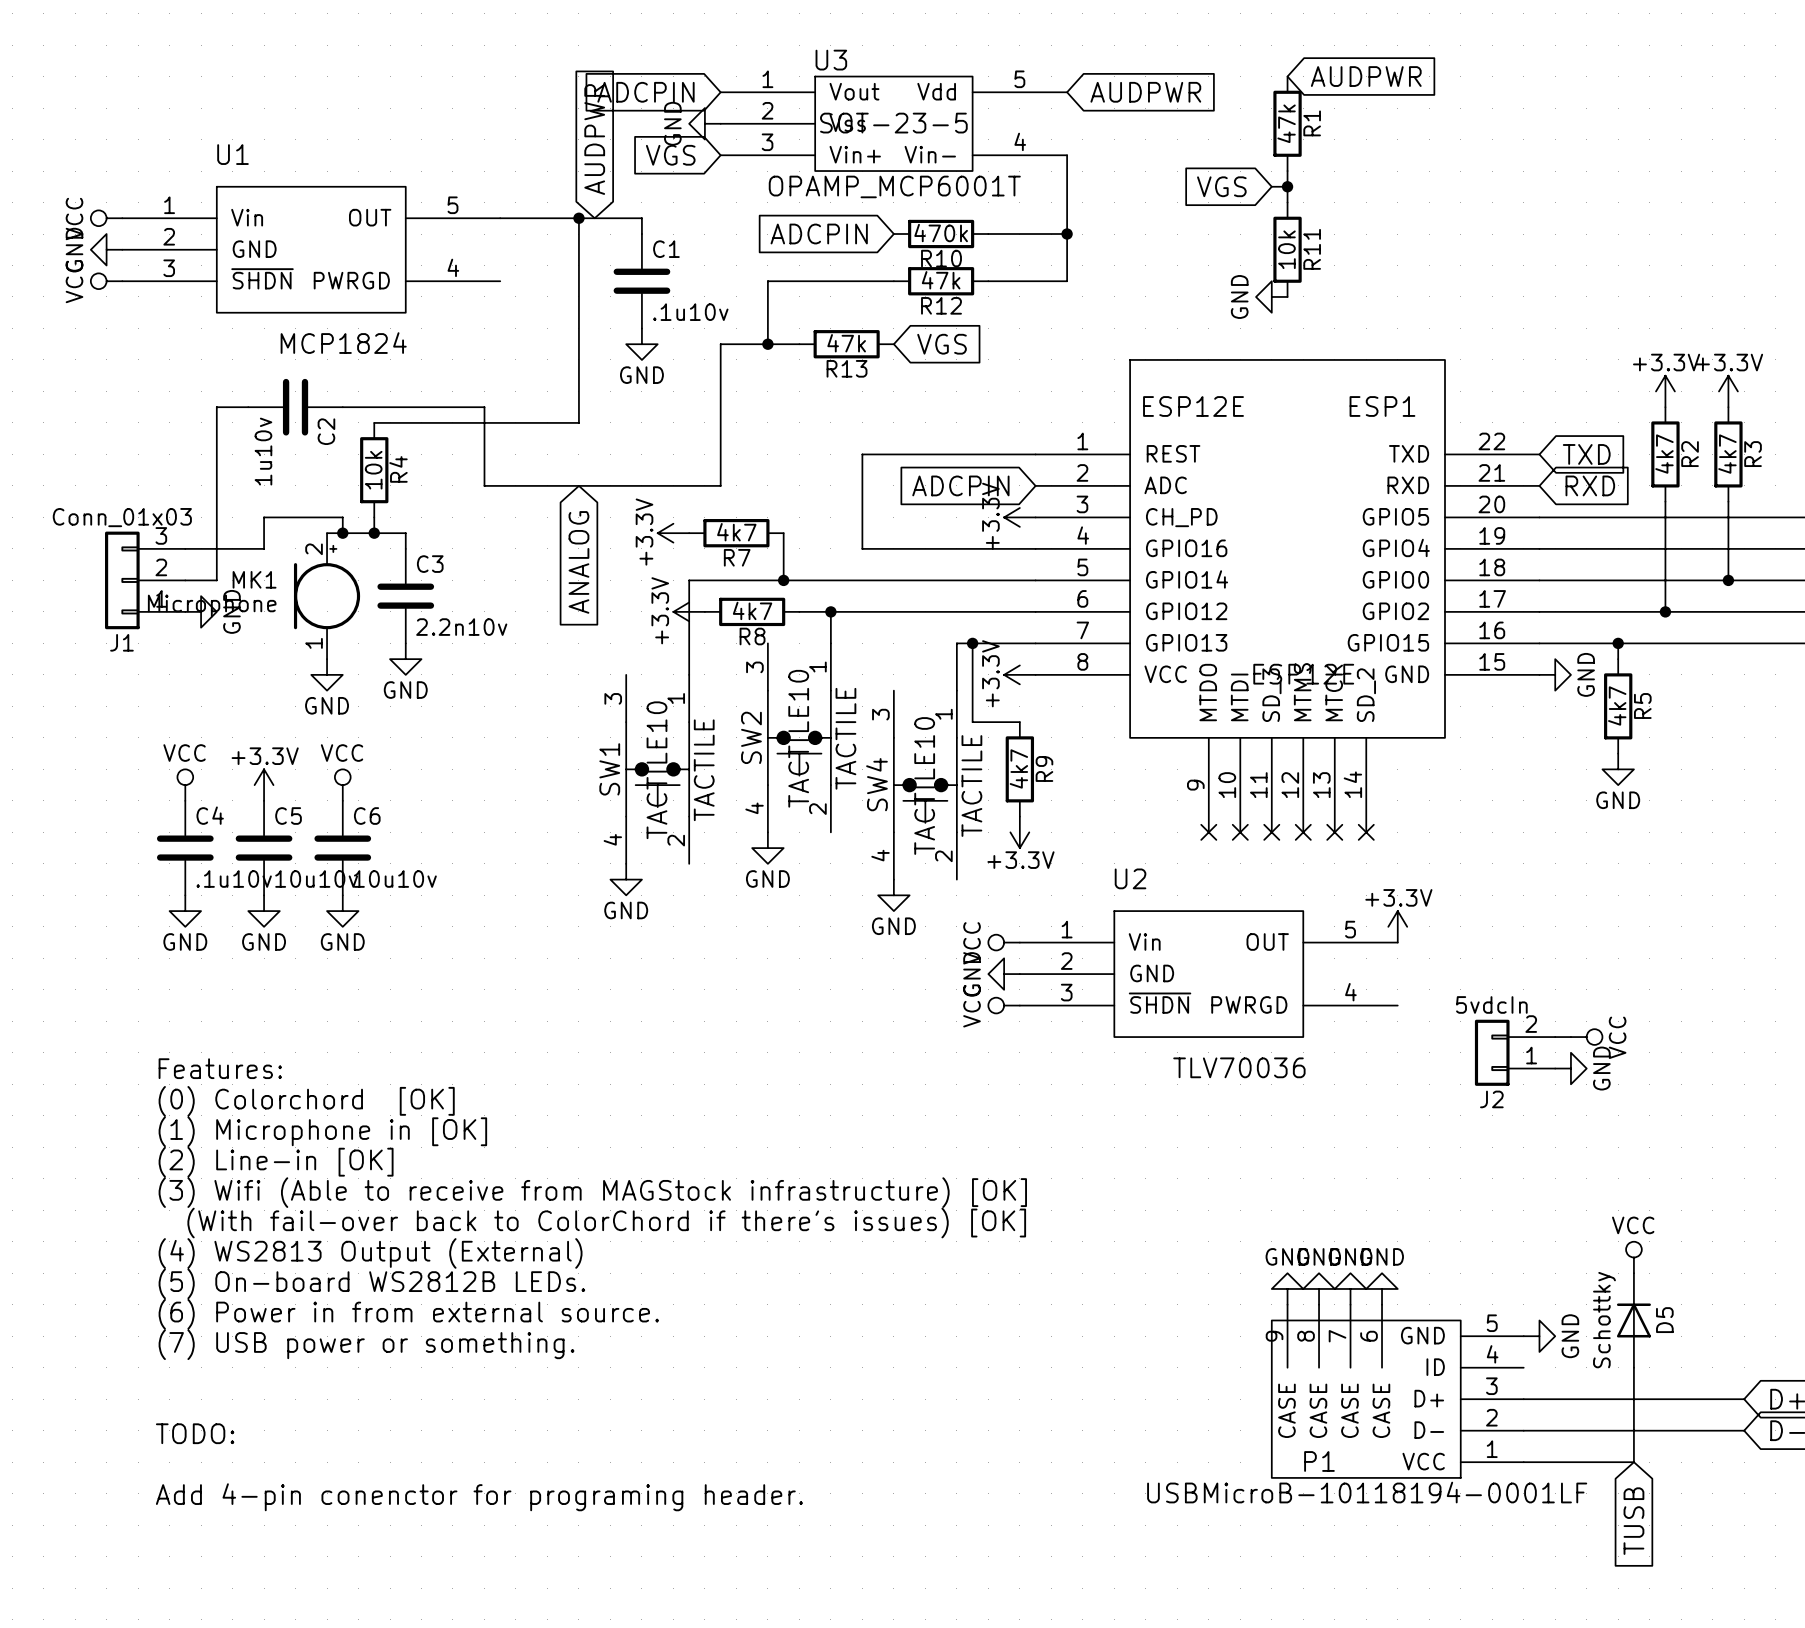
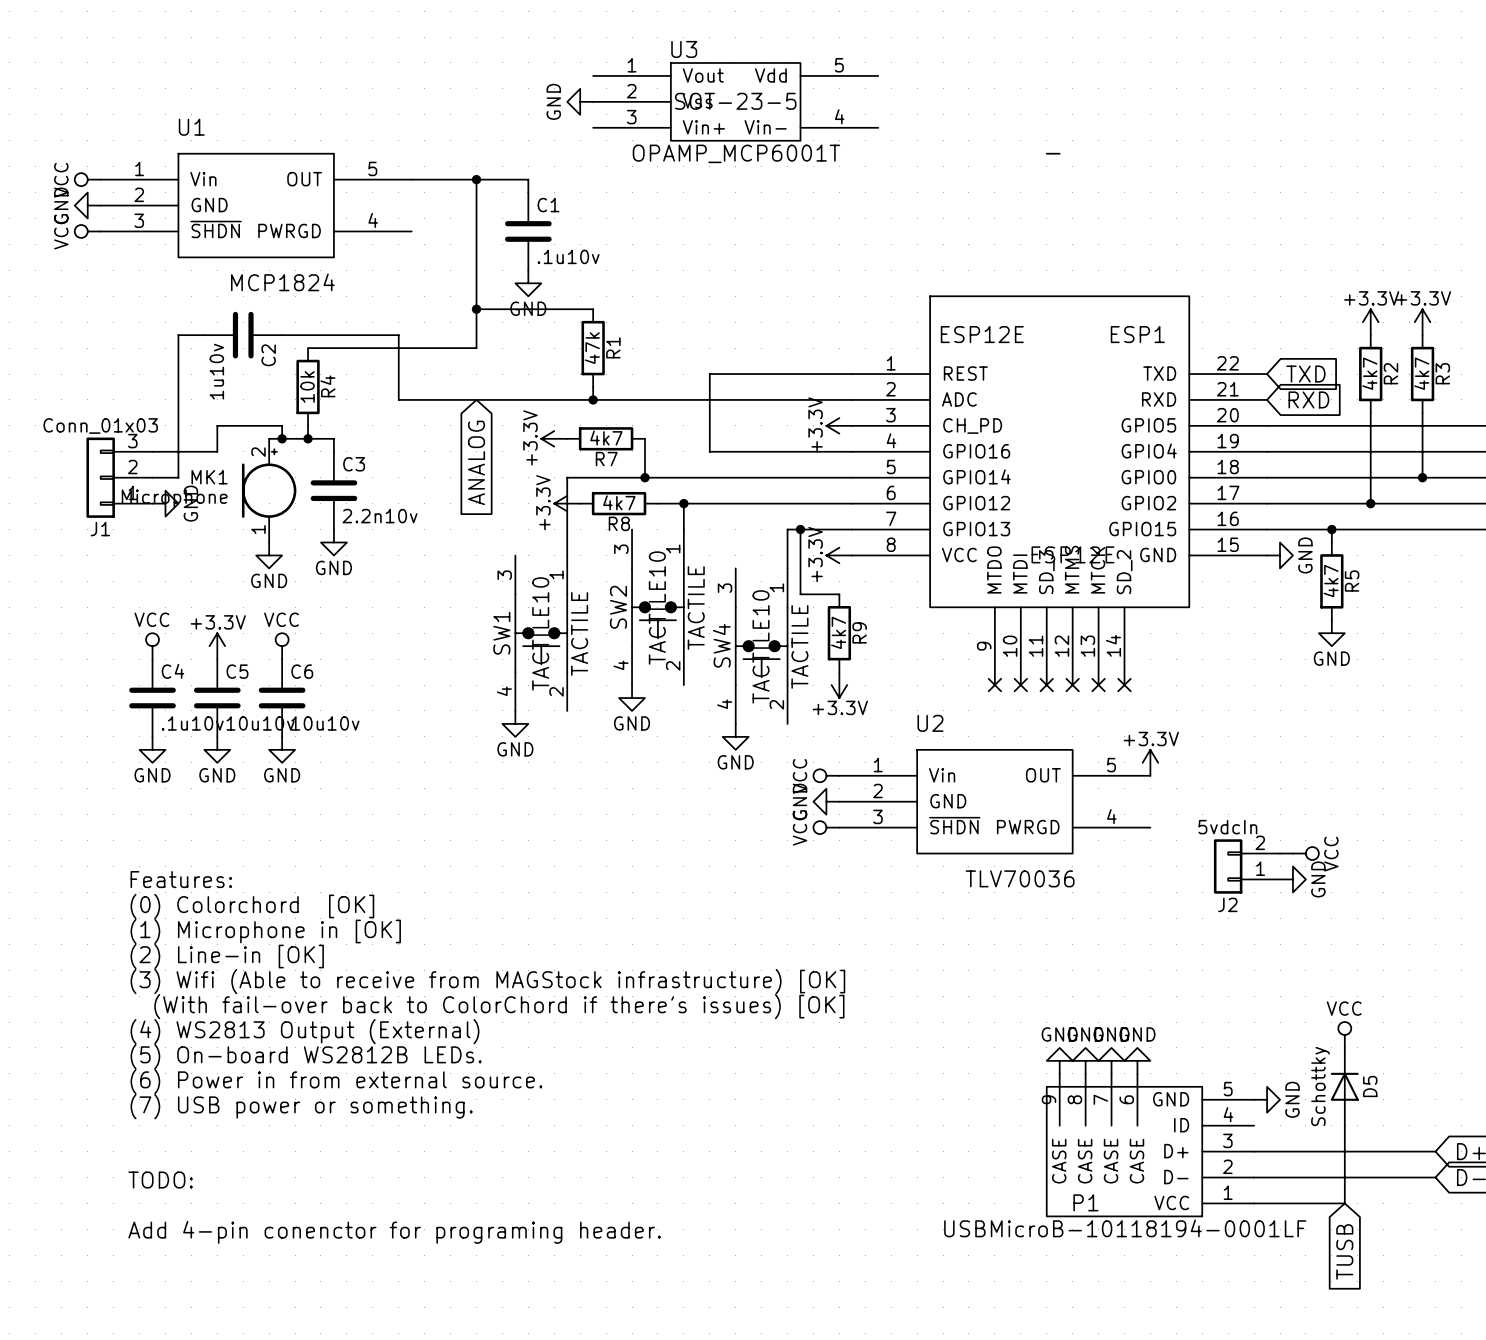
global label: AUDPWR (1366, 76) -> none
global label: ADCPIN (645, 92) -> none
global label: AUDPWR (1145, 92) -> none
R1 position: (1287, 123) -> (593, 348)
global label: AUDPWR (594, 139) -> none
global label: VGS (670, 155) -> none
wire: (1067, 155) (1067, 281) (988, 281) -> none
wire: (1287, 171) (1287, 202) -> none
global label: VGS (1221, 186) -> none
junction: (1287, 186) -> none
global label: ADCPIN (819, 234) -> none
R10: 470k (941, 234) -> none
wire: (988, 234) (1067, 234) -> none
junction: (1067, 234) -> none
R11: 10k (1287, 249) -> none
wire: (893, 281) (767, 281) (767, 344) -> none
R12: 47k (941, 281) -> none
power symbol: GND (1271, 296) -> none
junction: (767, 344) -> none
wire: (799, 344) (720, 344) (720, 470) -> none
R13: 47k (846, 344) -> none
global label: VGS (942, 344) -> none
wire: none -> (476, 309) (593, 309)
junction: none -> (476, 309)
wire: none -> (593, 399) (852, 399)
junction: none -> (593, 399)
global label: ADCPIN (960, 485) -> none

